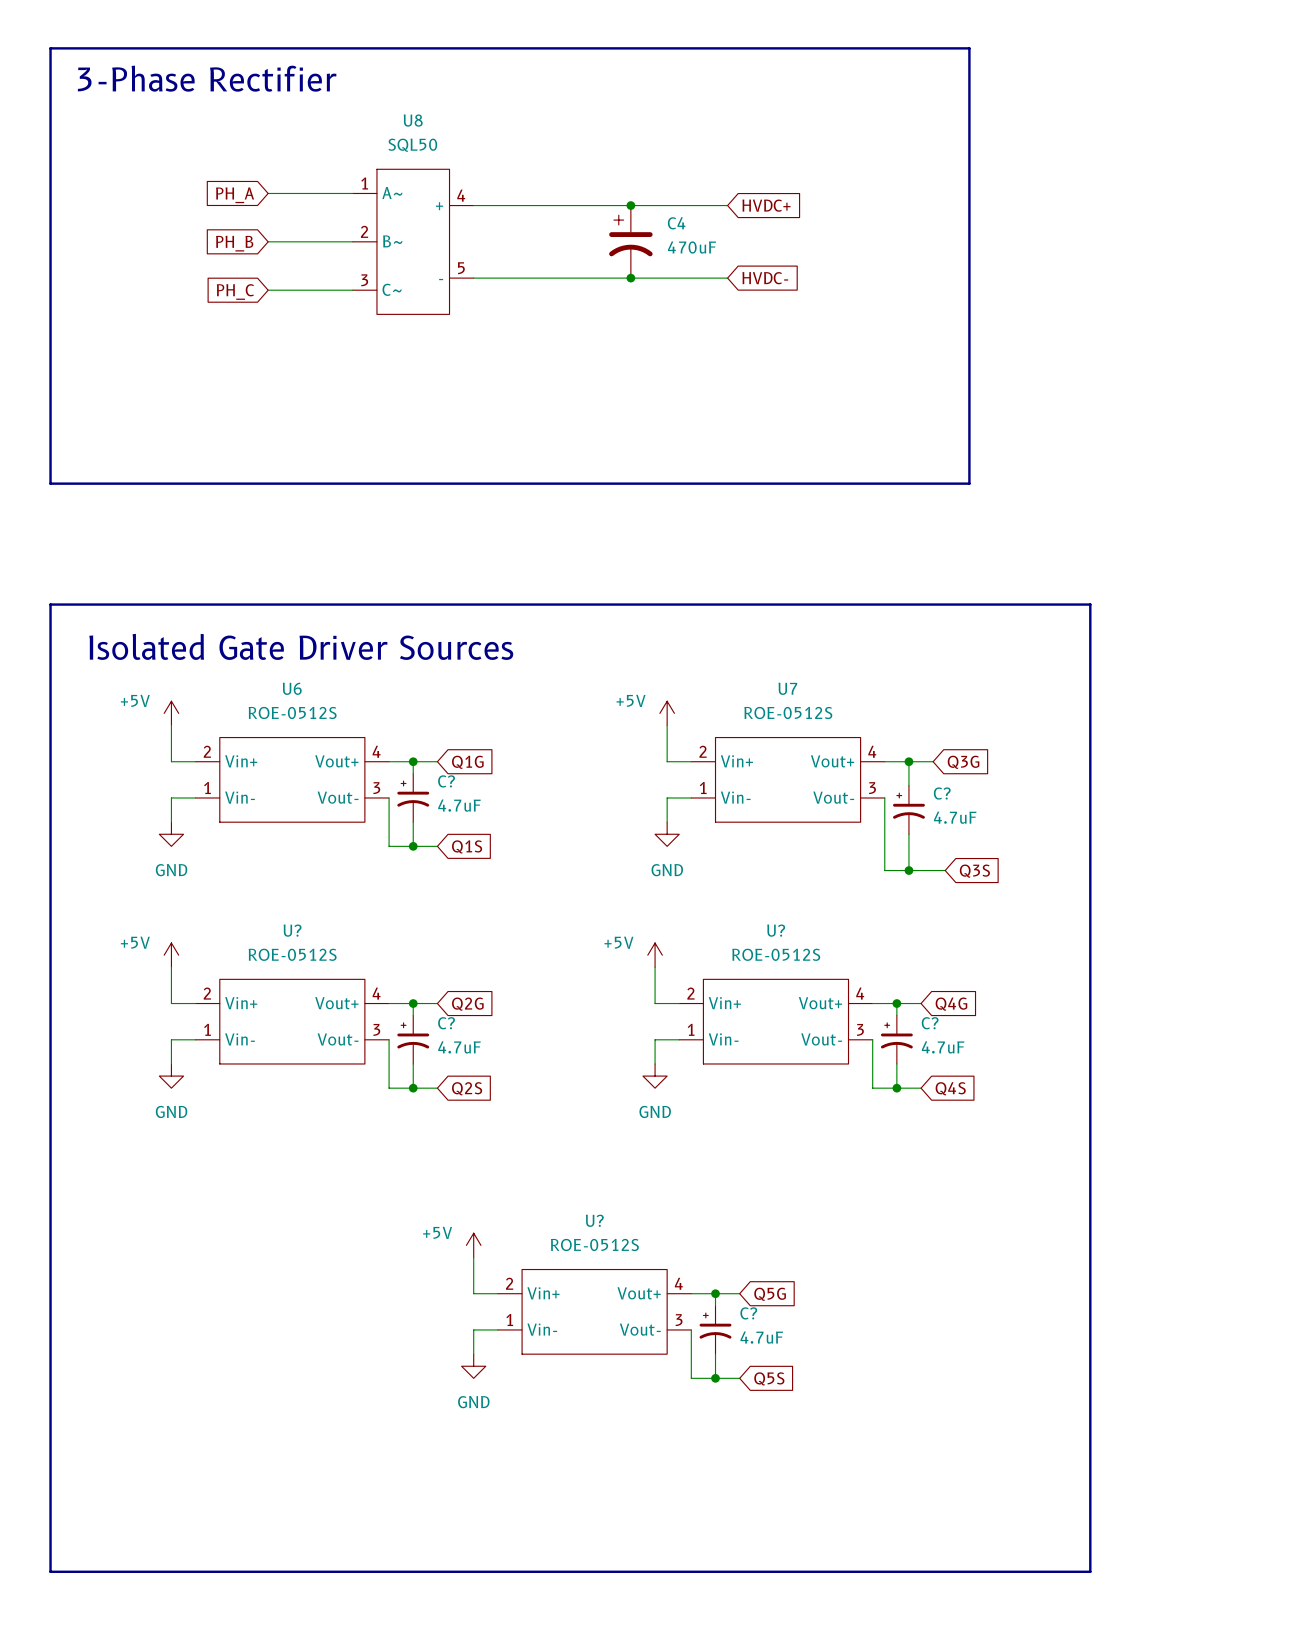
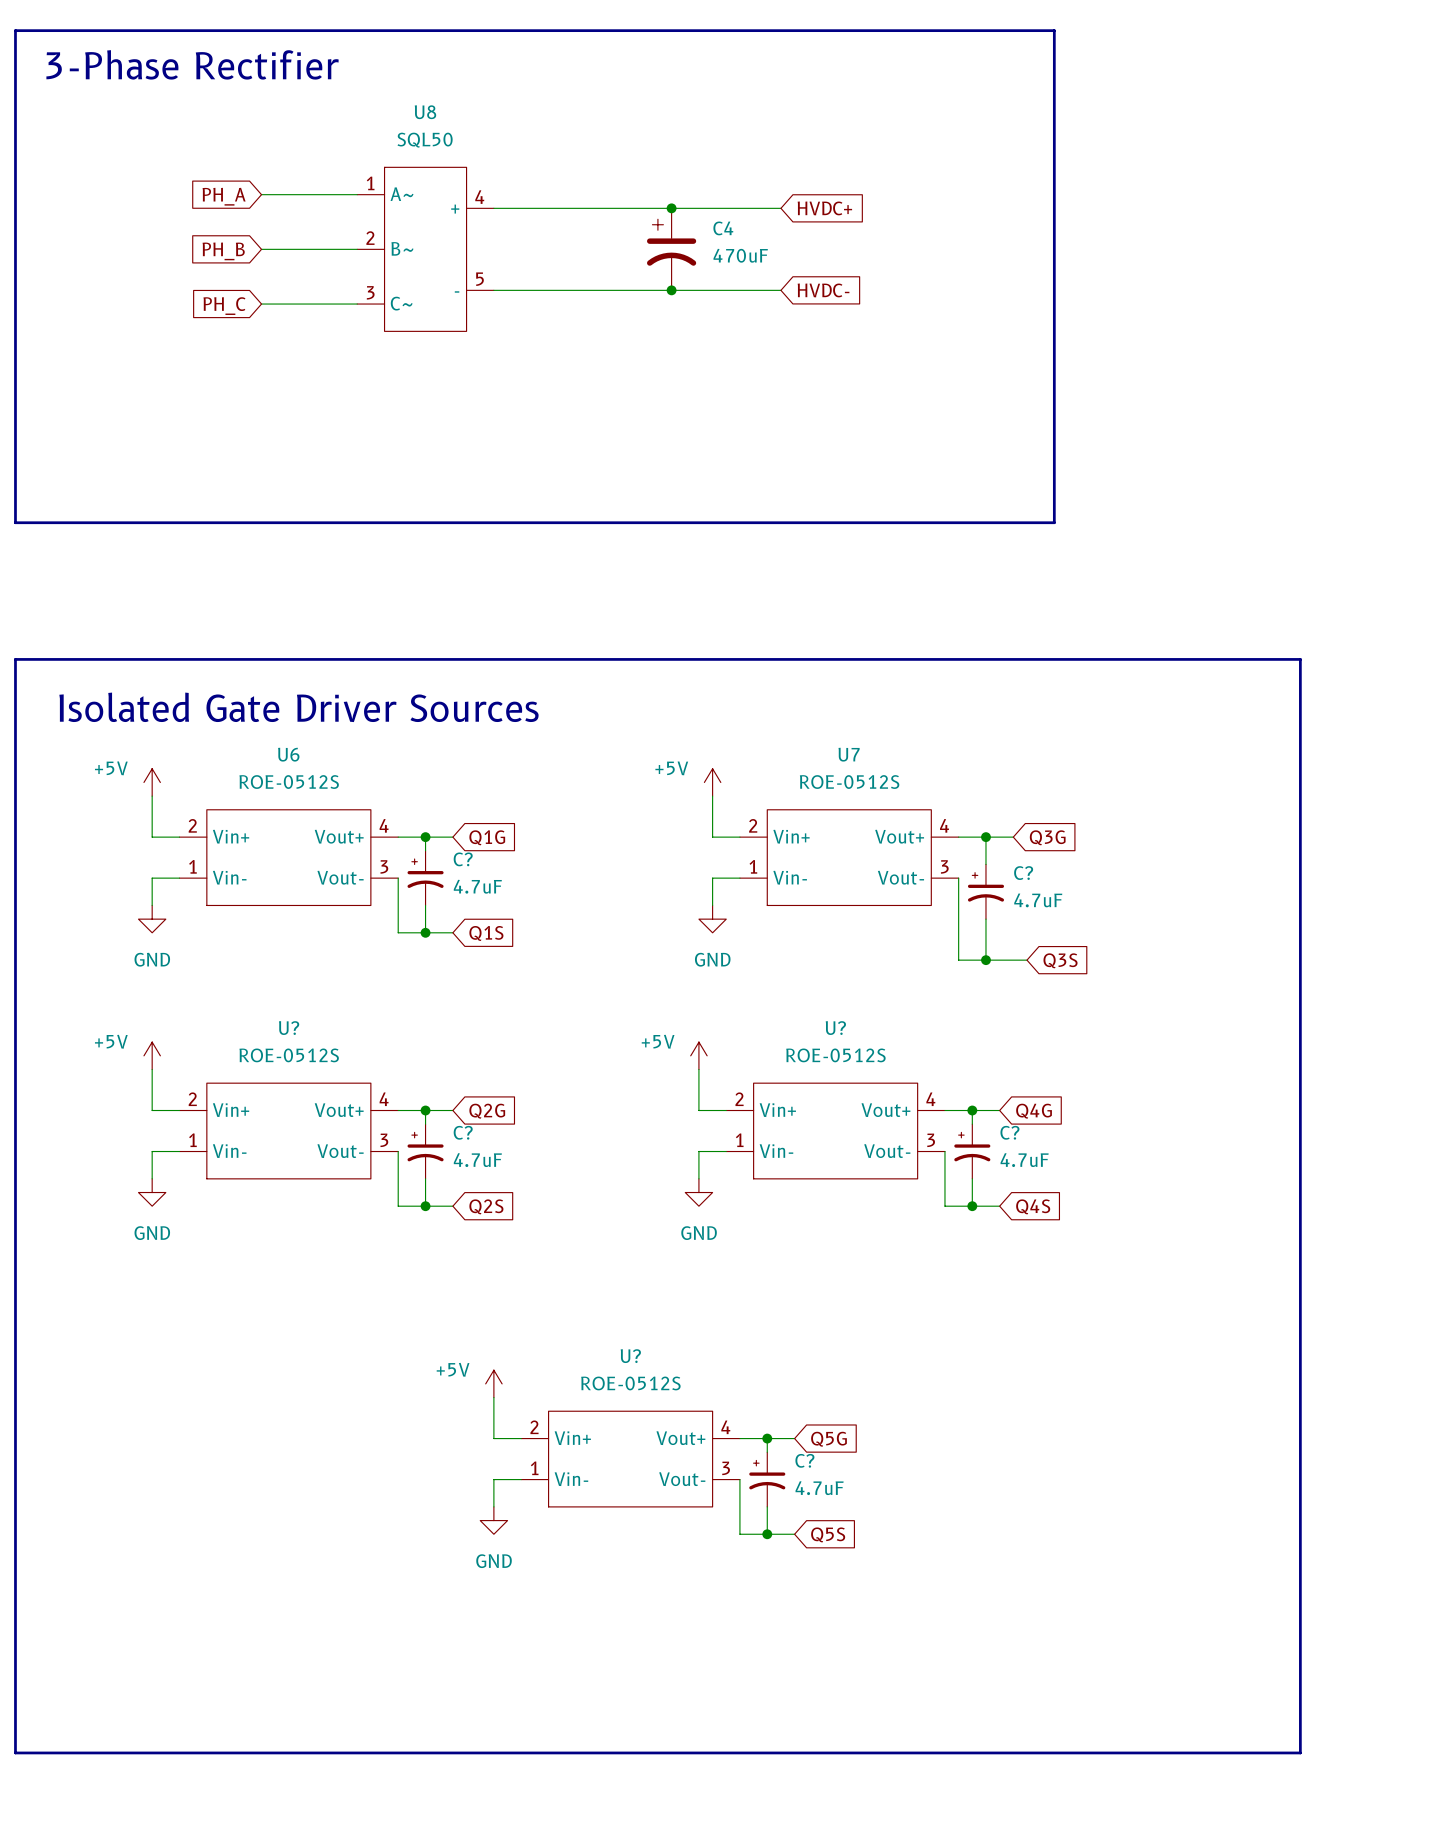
line: (1090, 604) (1090, 1571) -> (1191, 659) (1300, 659) (1300, 1752) (1191, 1752)

